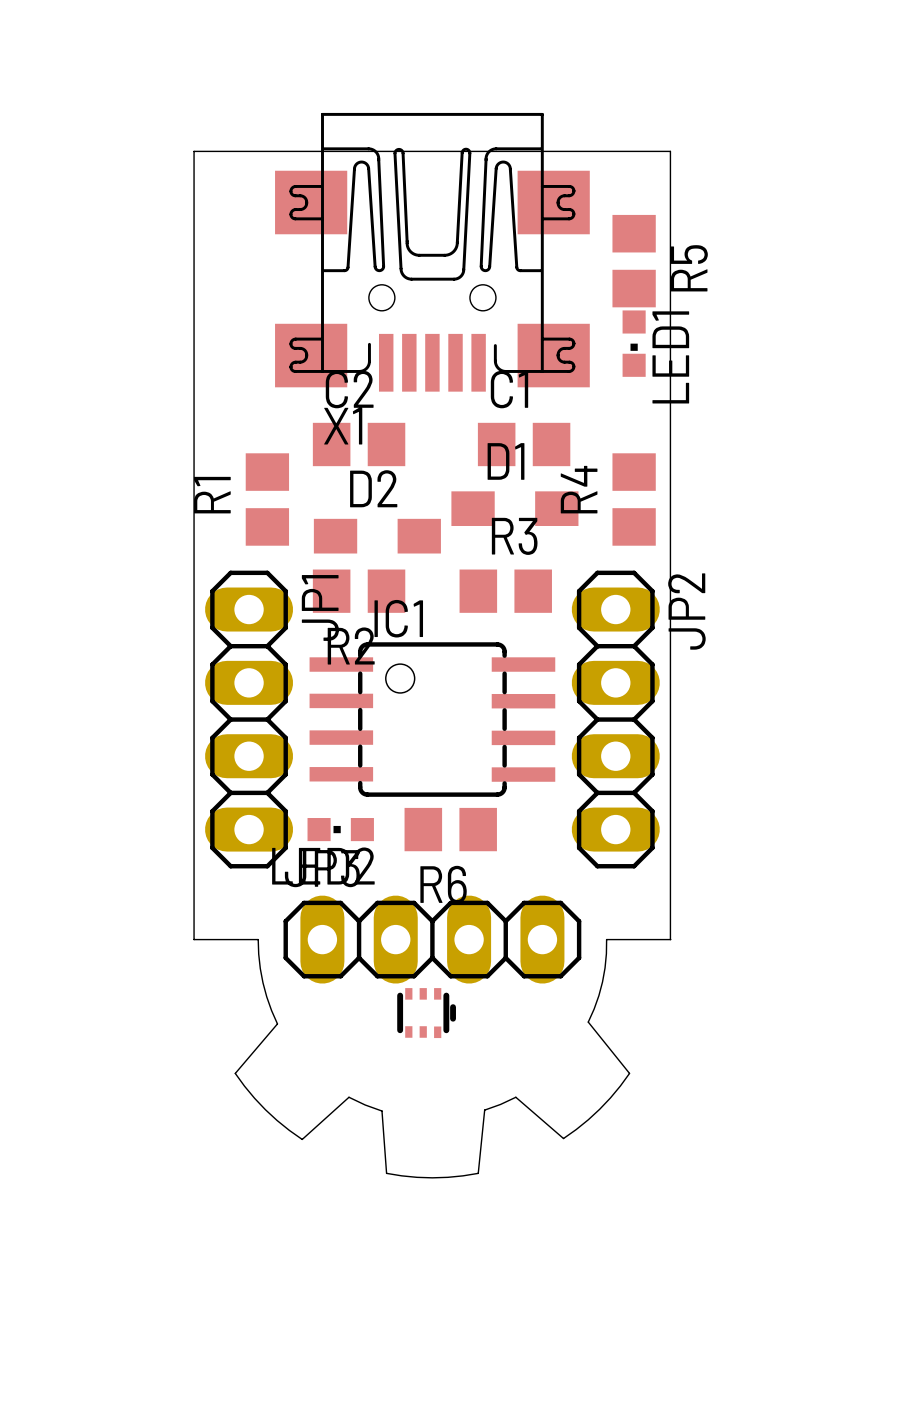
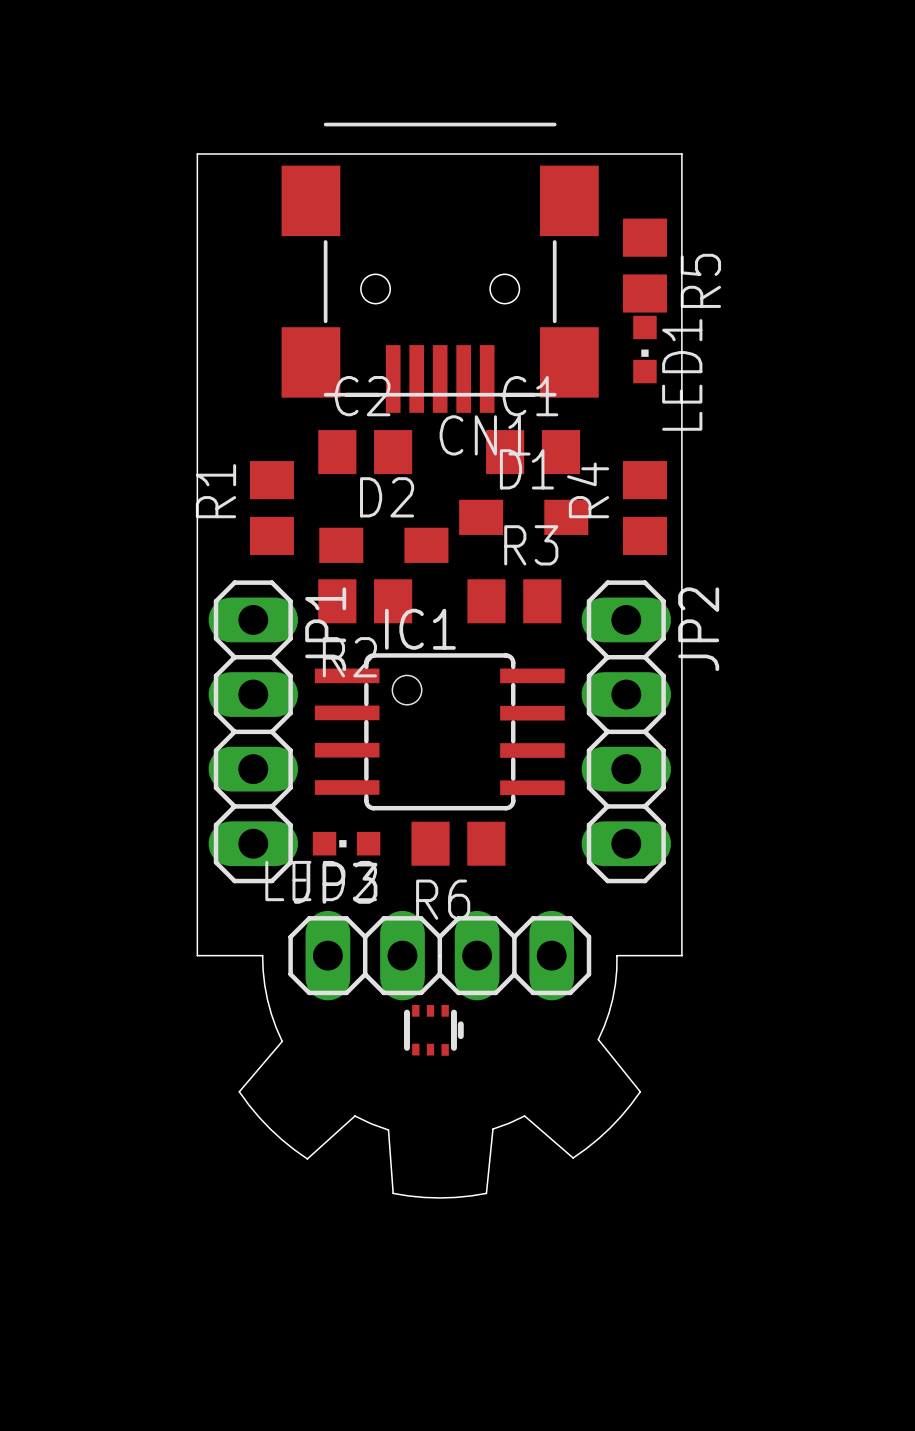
X1: (432, 252) -> none
CN1: none -> (440, 267)

